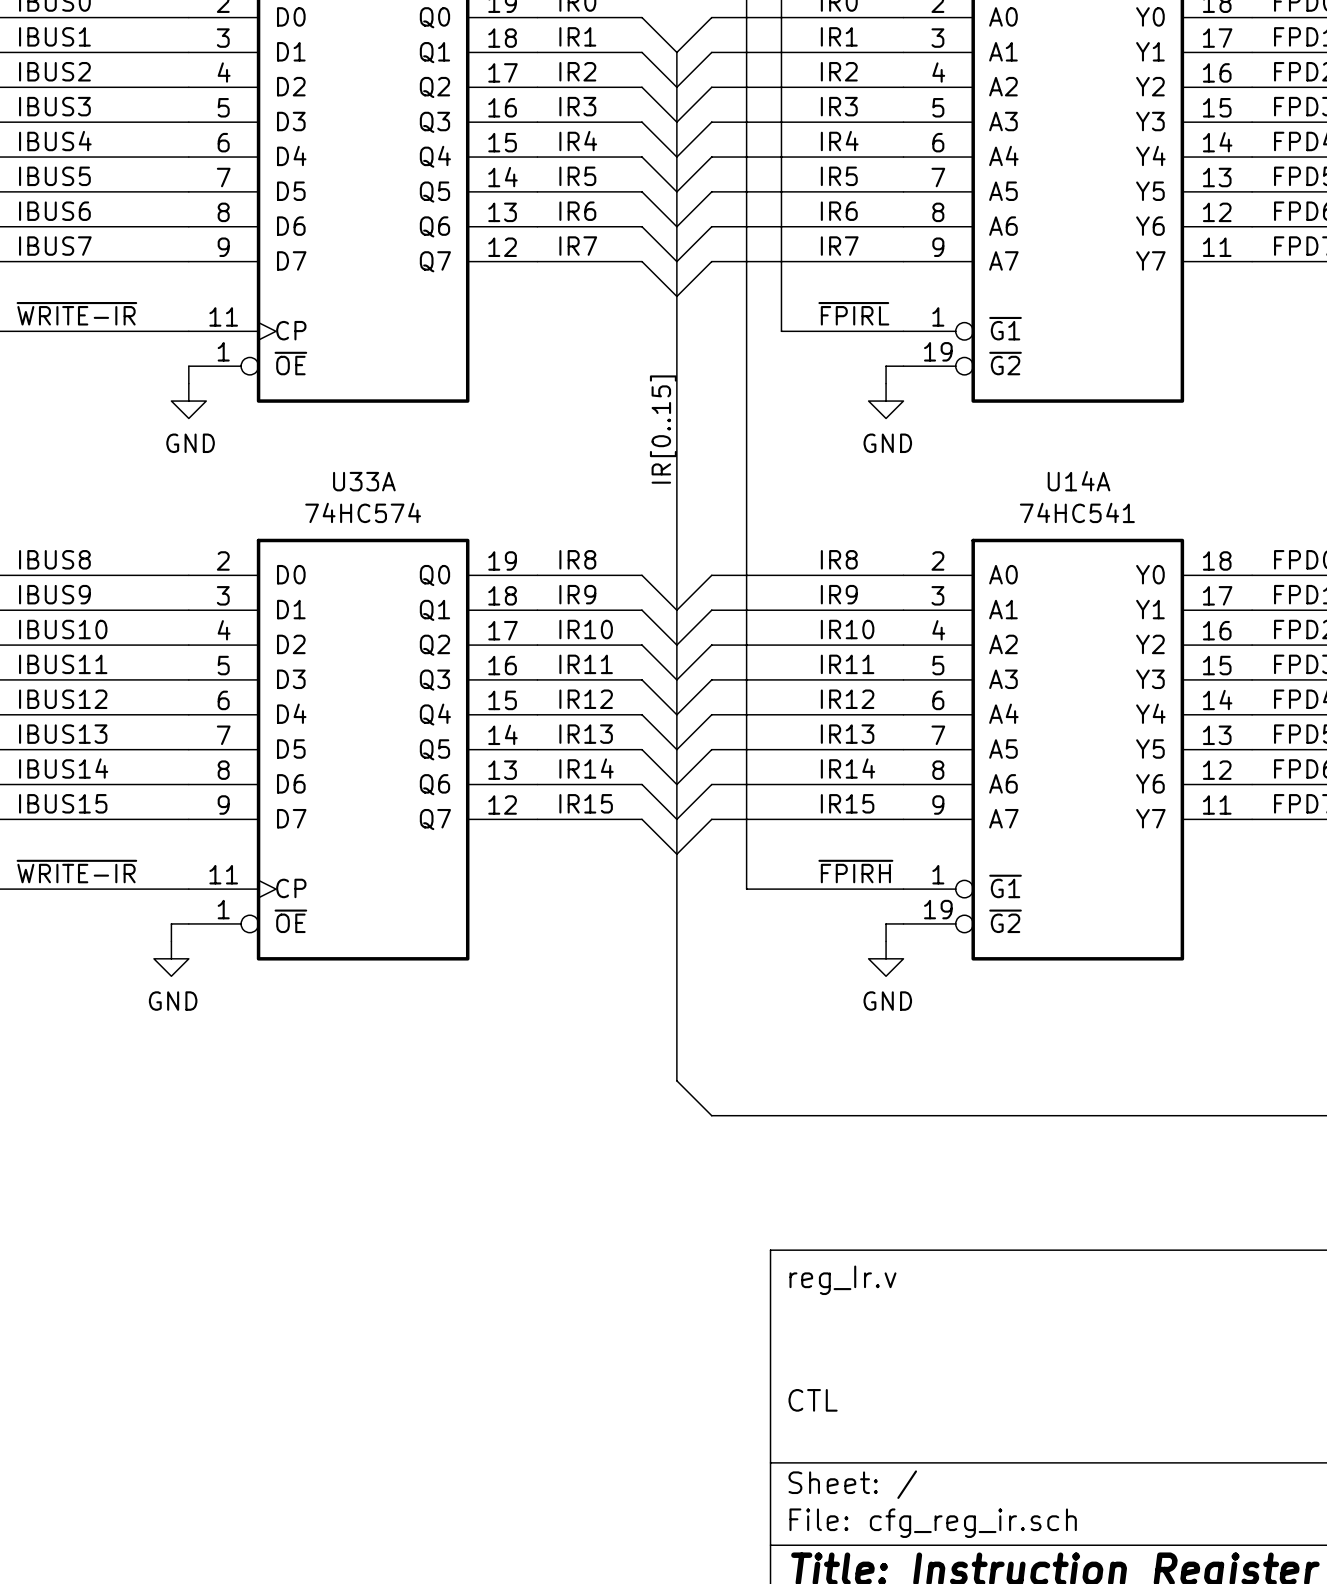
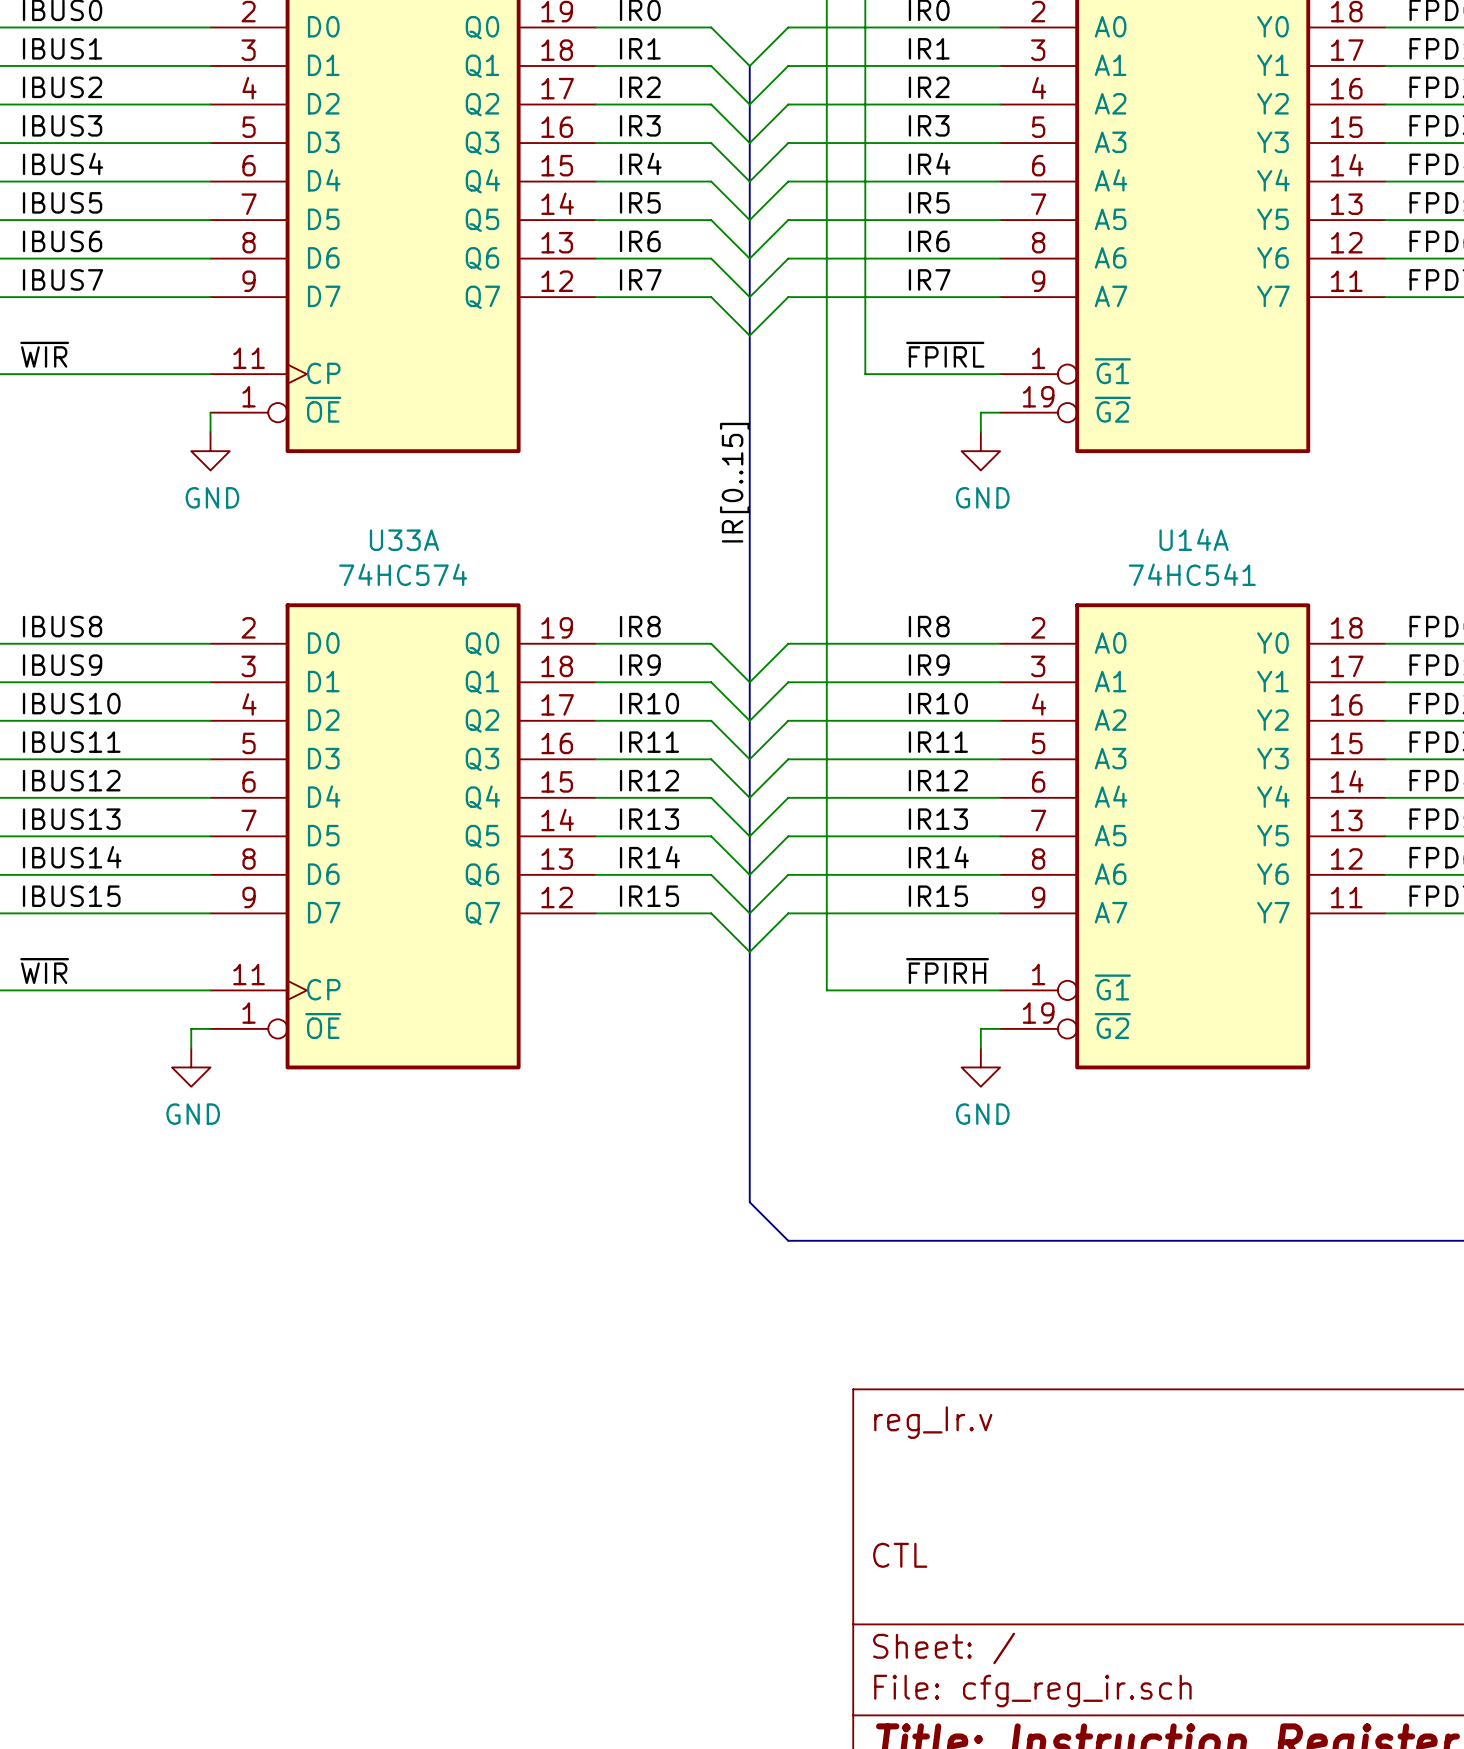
label: ~{WRITE-IR} (76, 313) -> ~{WIR} (44, 354)
label: ~{WRITE-IR} (76, 871) -> ~{WIR} (44, 971)

